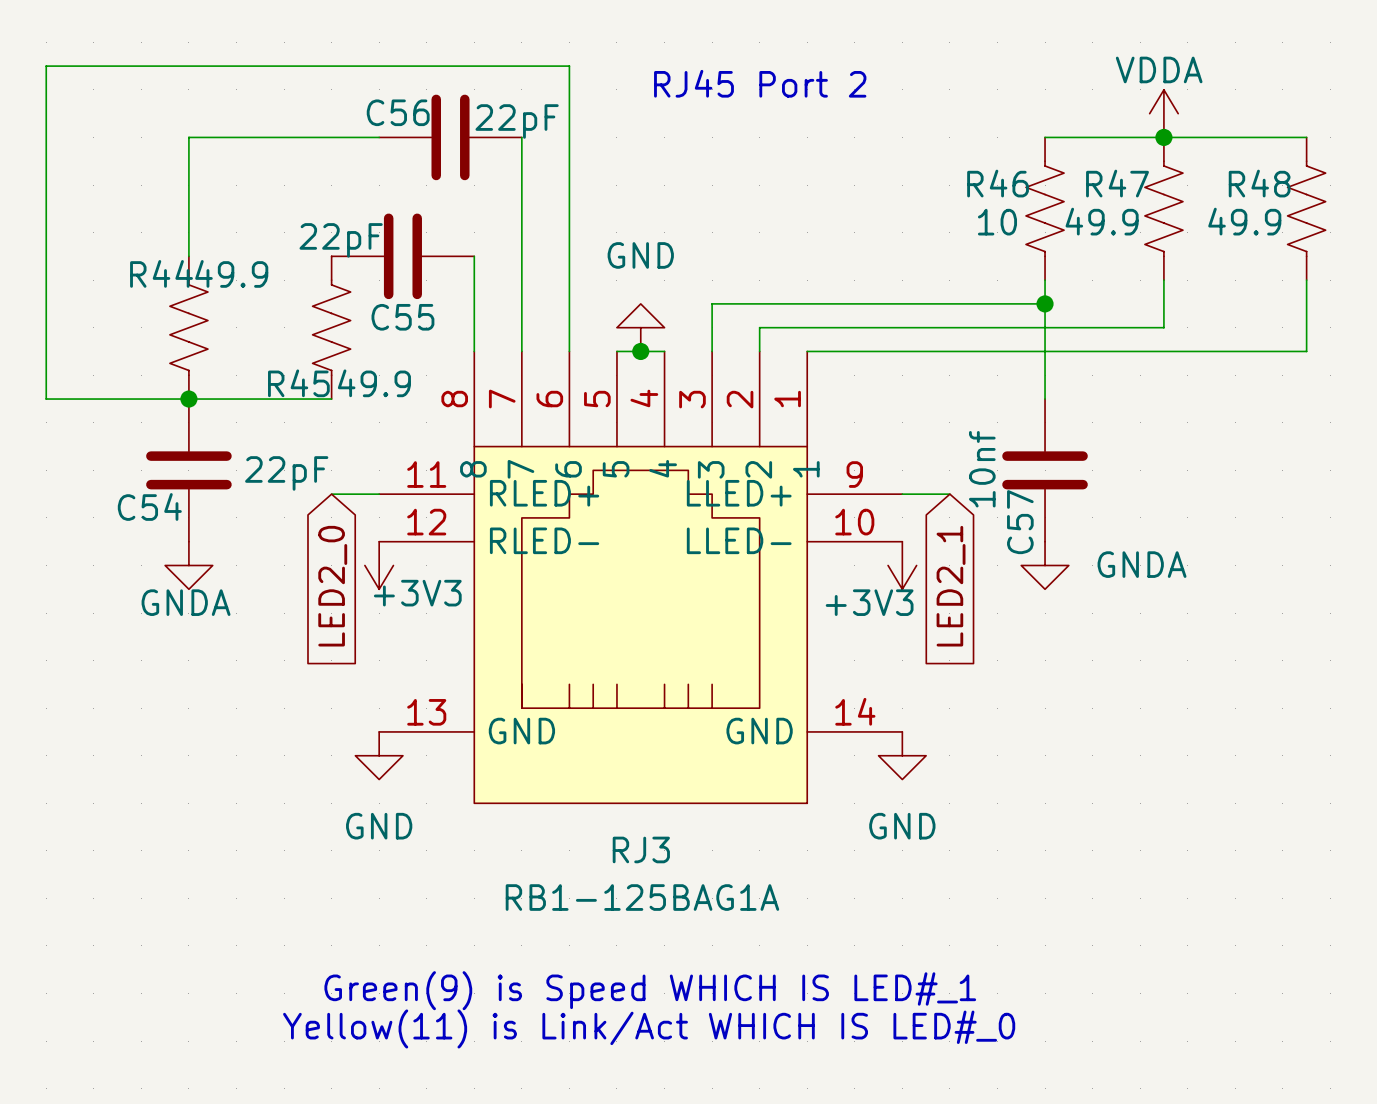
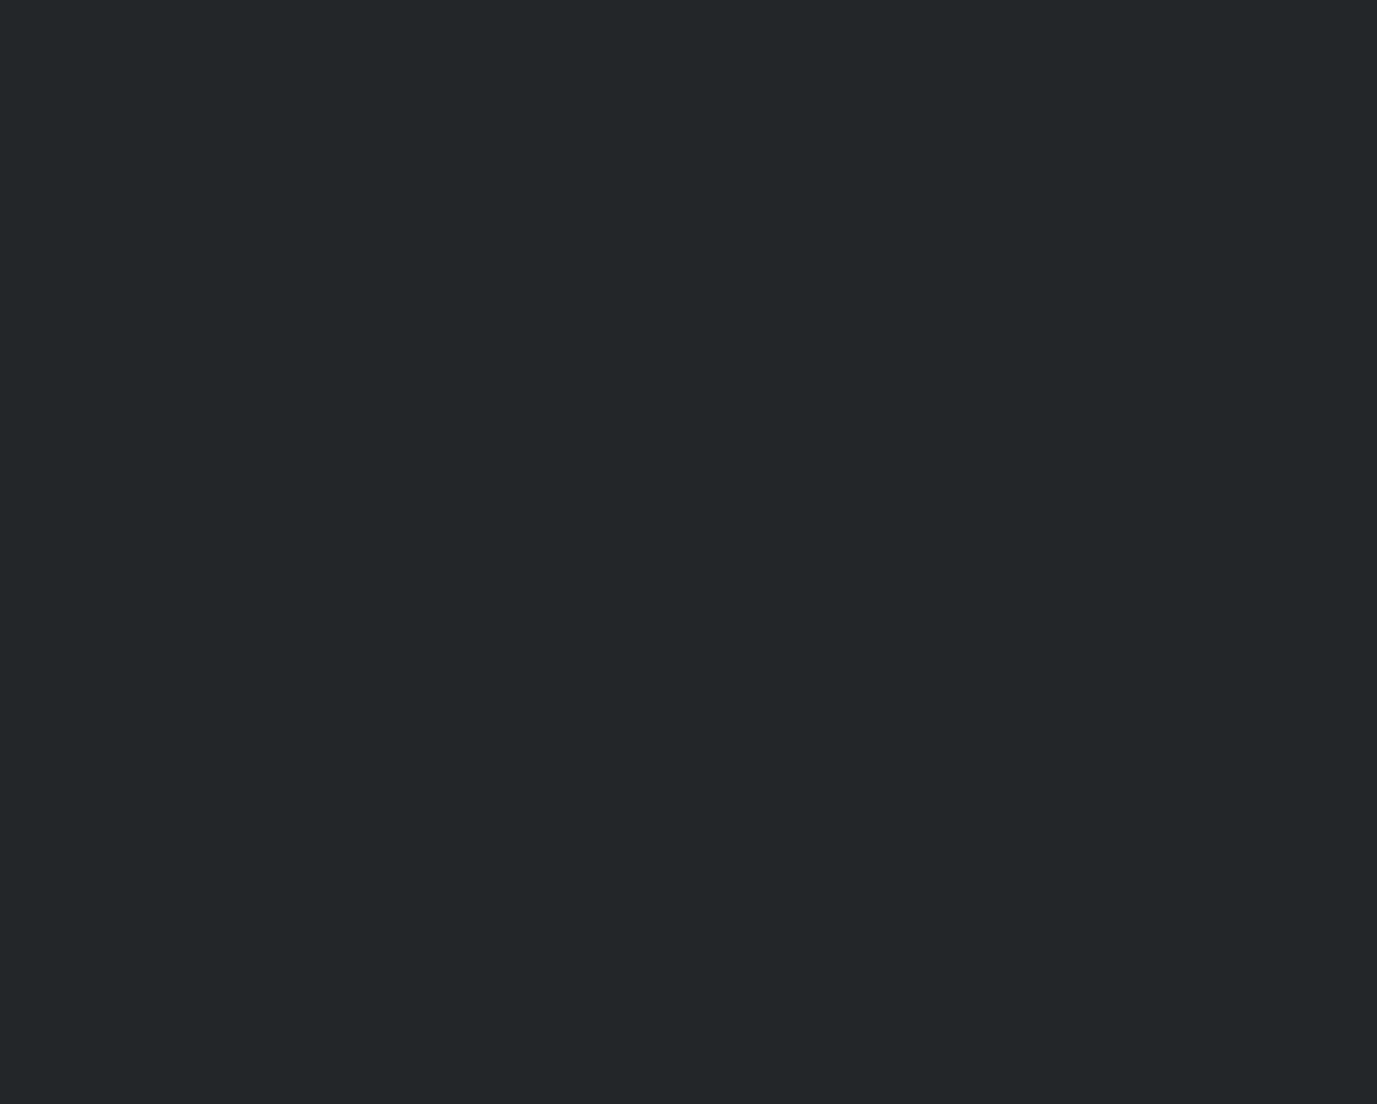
text: RJ45 Port 2 (760, 83) -> none
power symbol: VDDA (1163, 113) -> none
wire: (379, 137) (188, 137) (188, 256) -> none
C56: 22pF (450, 137) -> none
wire: (521, 137) (521, 351) -> none
wire: (1045, 137) (1306, 137) -> none
junction: (1163, 137) -> none
R46: 10 (1045, 208) -> none
R47: 49.9 (1163, 208) -> none
R48: 49.9 (1306, 208) -> none
C55: 22pF (402, 256) -> none
wire: (474, 256) (474, 351) -> none
wire: (1045, 280) (1045, 399) -> none
wire: (1163, 280) (1163, 327) (759, 327) (759, 351) -> none
wire: (1306, 280) (1306, 351) (807, 351) -> none
wire: (1045, 303) (712, 303) (712, 351) -> none
junction: (1045, 303) -> none
R44: 49.9 (188, 327) -> none
R45: 49.9 (331, 327) -> none
power symbol: GND (640, 327) -> none
wire: (569, 351) (569, 66) (46, 66) (46, 399) (331, 399) -> none
wire: (616, 351) (664, 351) -> none
junction: (640, 351) -> none
junction: (188, 399) -> none
C54: 22pF (188, 470) -> none
C57: 10nf (1045, 470) -> none
wire: (331, 494) (379, 494) -> none
wire: (902, 494) (949, 494) -> none
power symbol: GNDA (188, 565) -> none
power symbol: +3V3 (379, 565) -> none
power symbol: +3V3 (902, 565) -> none
power symbol: GNDA (1045, 565) -> none
RJ3: RB1-125BAG1A (640, 577) -> none
global label: LED2_0 (332, 586) -> none
global label: LED2_1 (951, 586) -> none
power symbol: GND (379, 755) -> none
power symbol: GND (902, 755) -> none
text: Green(9) is Speed WHICH IS LED#_1 (650, 990) -> none
text: Yellow(11) is Link/Act WHICH IS LED#_0 (649, 1028) -> none

